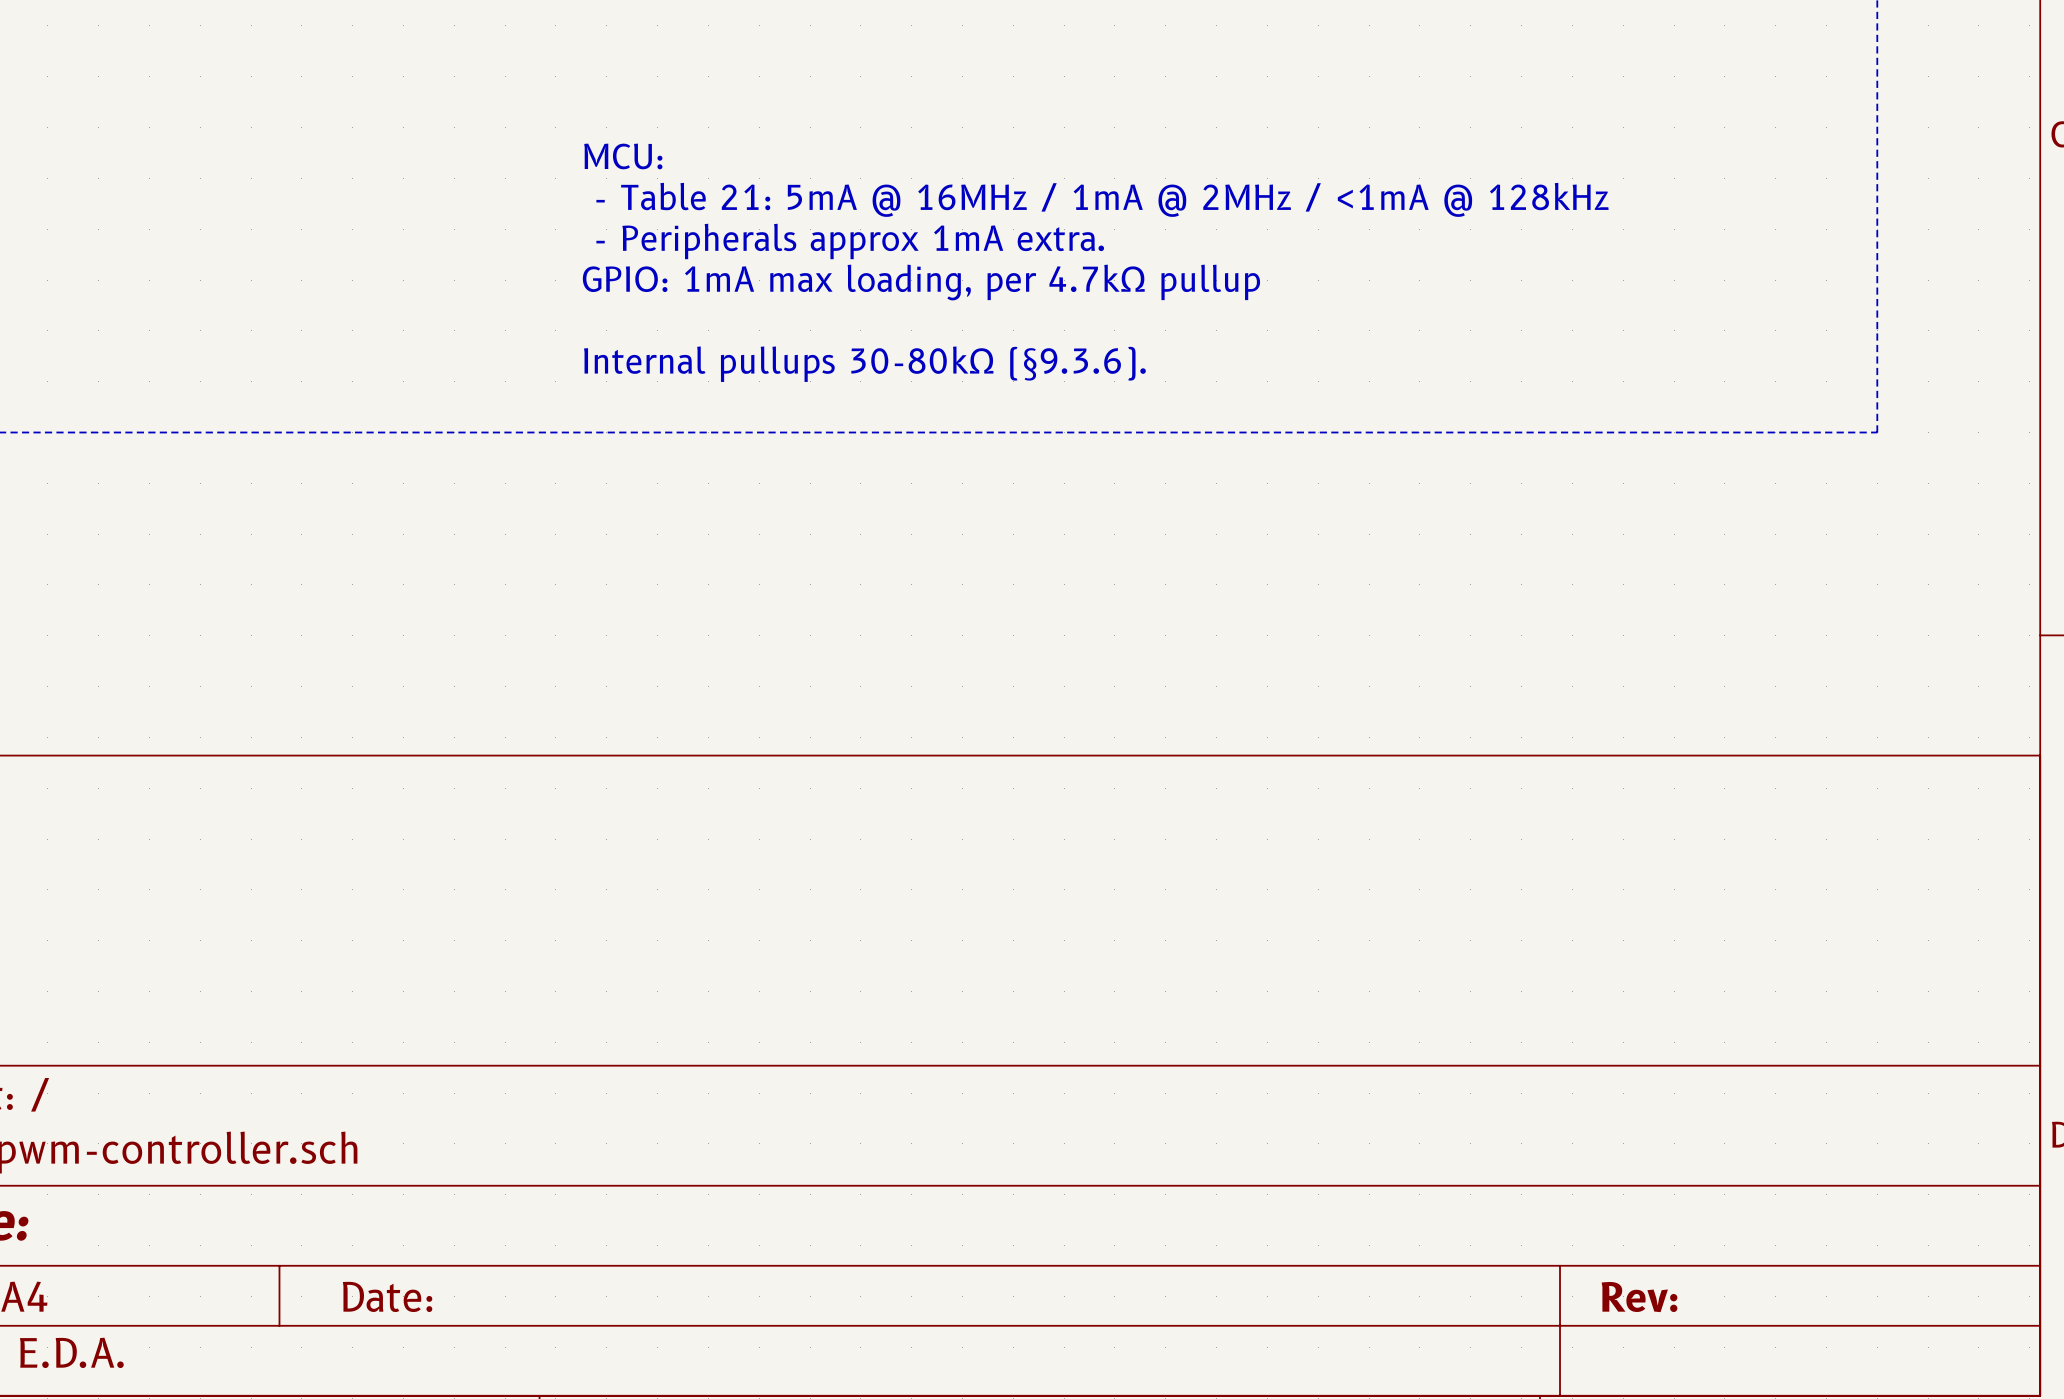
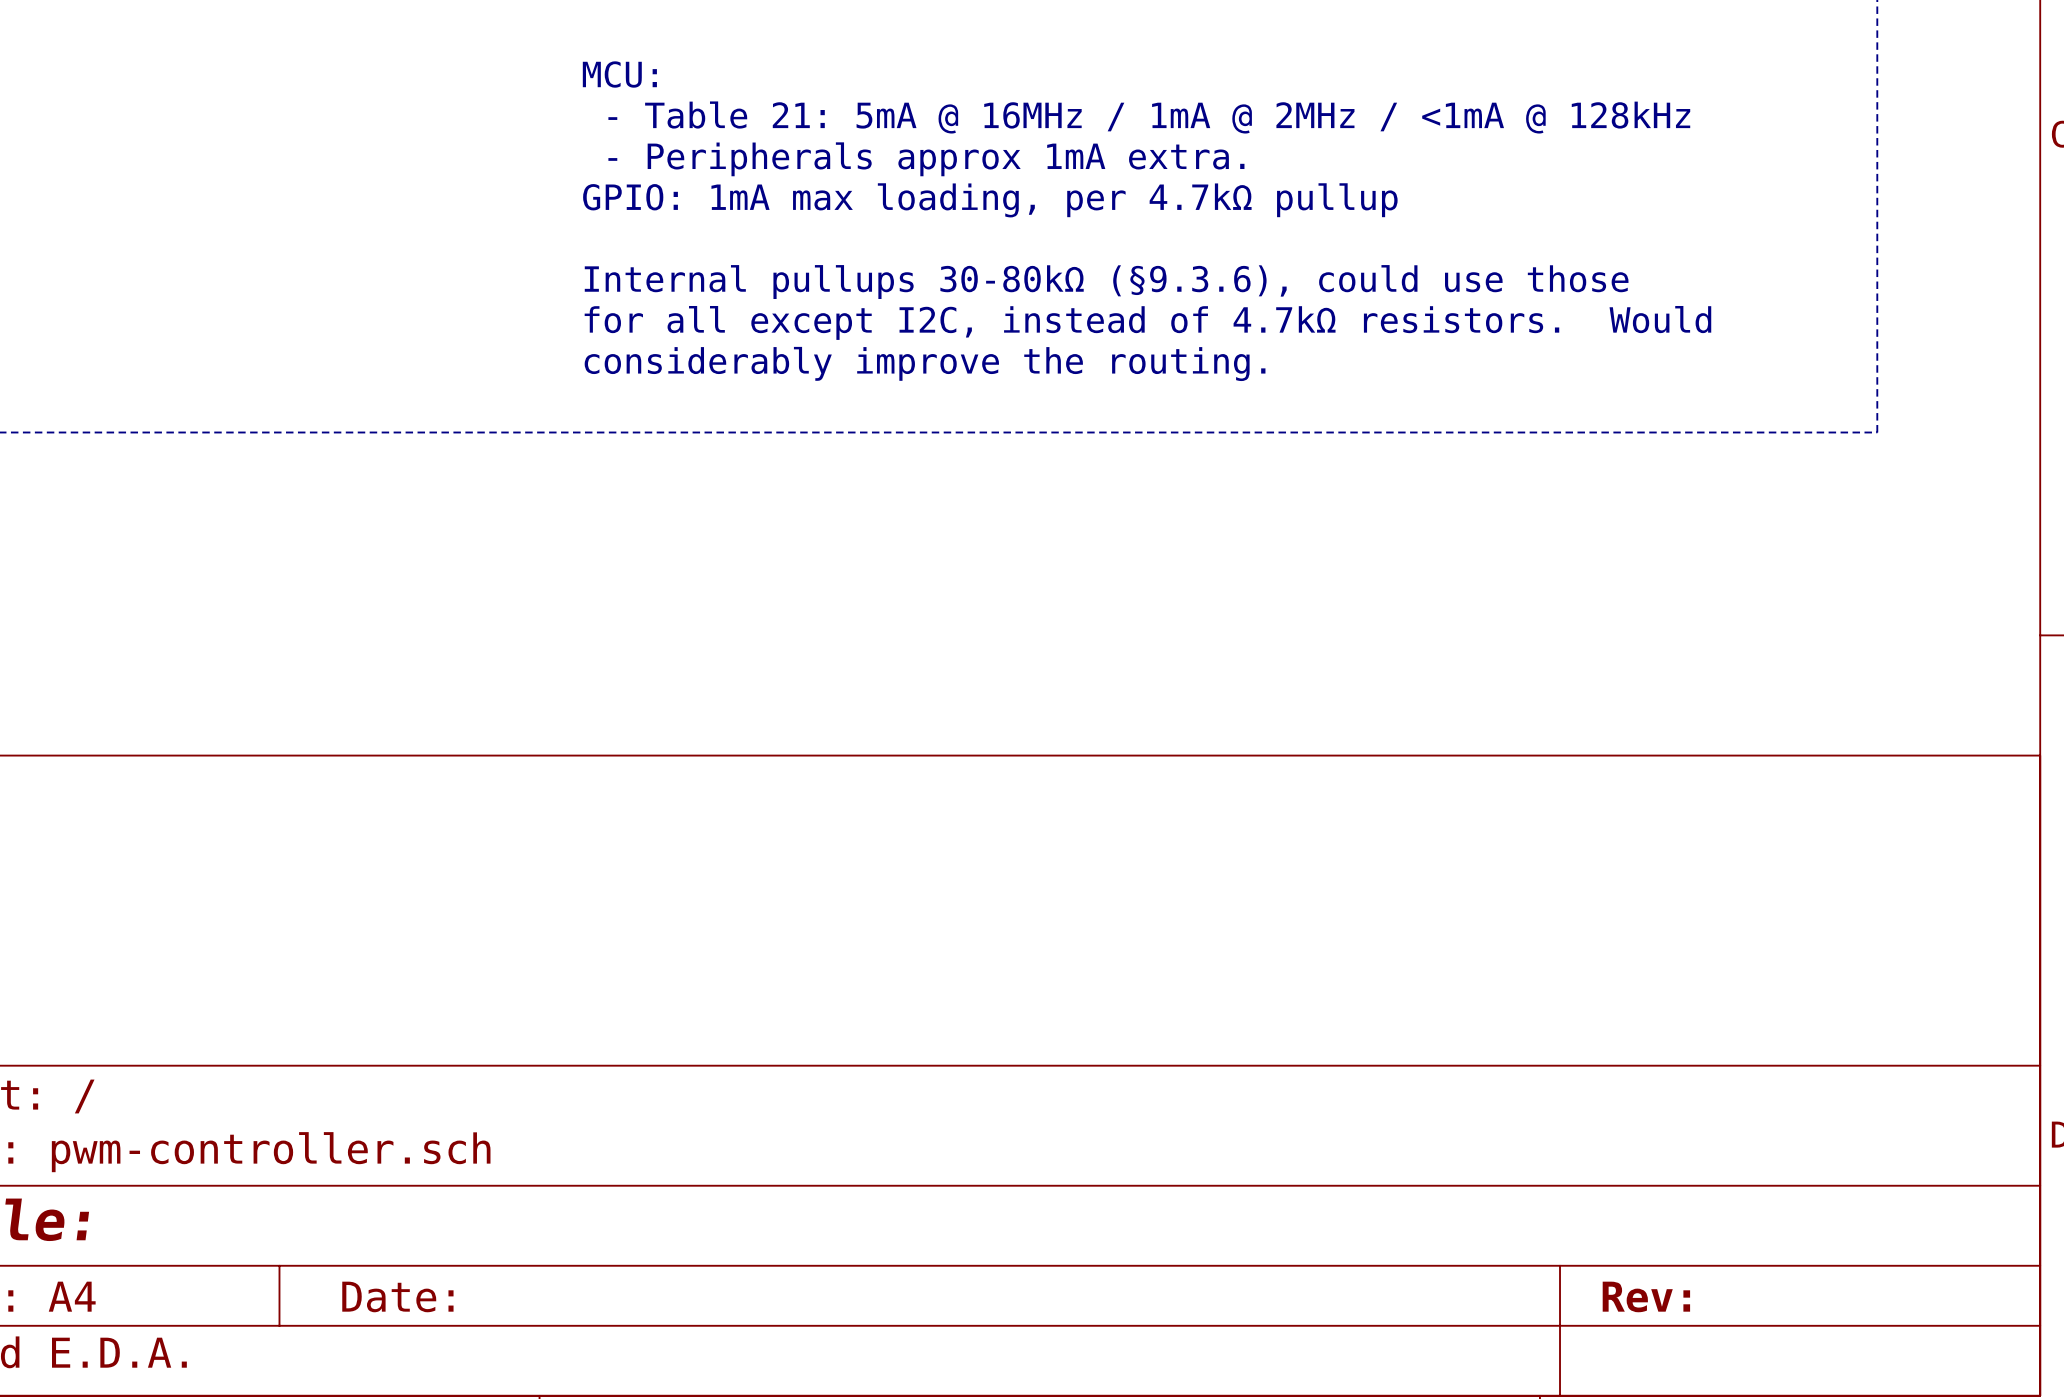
text: none -> MCU: (619, 74)
text: none -> - Table 21: 5mA @ 16MHz / 1mA @ 2MHz / <1mA @ 128kHz (1149, 117)
text: MCU: (623, 156) -> - Peripherals approx 1mA extra. (926, 159)
text: - Table 21: 5mA @ 16MHz / 1mA @ 2MHz / <1mA @ 128kHz (1102, 199) -> GPIO: 1mA max loading, per 4.7kΩ pullup (990, 200)
text: - Peripherals approx 1mA extra. (850, 241) -> none
text: GPIO: 1mA max loading, per 4.7kΩ pullup (921, 282) -> Internal pullups 30-80kΩ (§9.3.6), could use those (1106, 282)
text: none -> for all except I2C, instead of 4.7kΩ resistors. Would (1147, 322)
text: Internal pullups 30-80kΩ (§9.3.6). (864, 364) -> considerably improve the routing. (925, 363)

